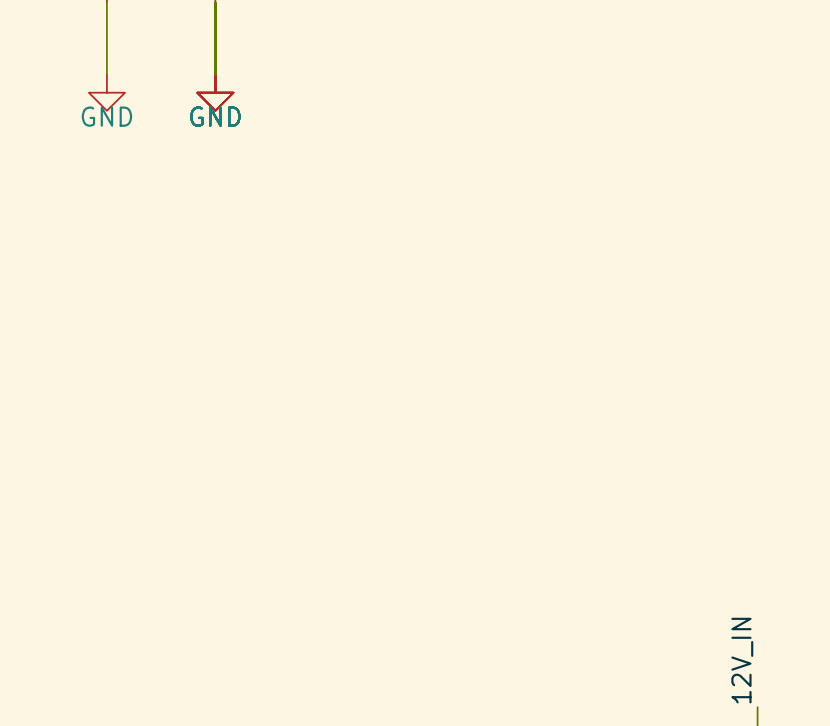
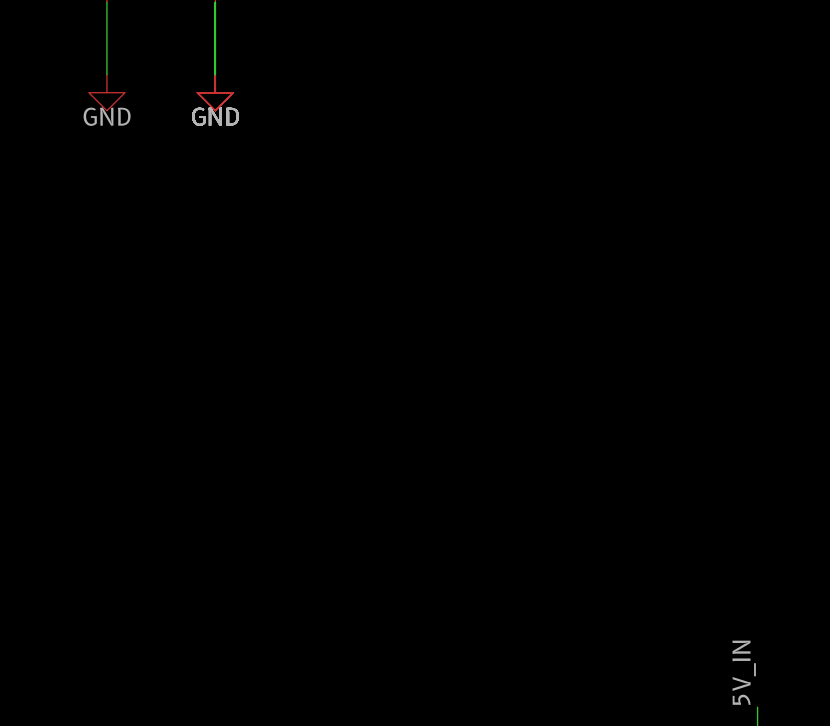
label: 12V_IN (742, 660) -> 5V_IN (744, 672)

